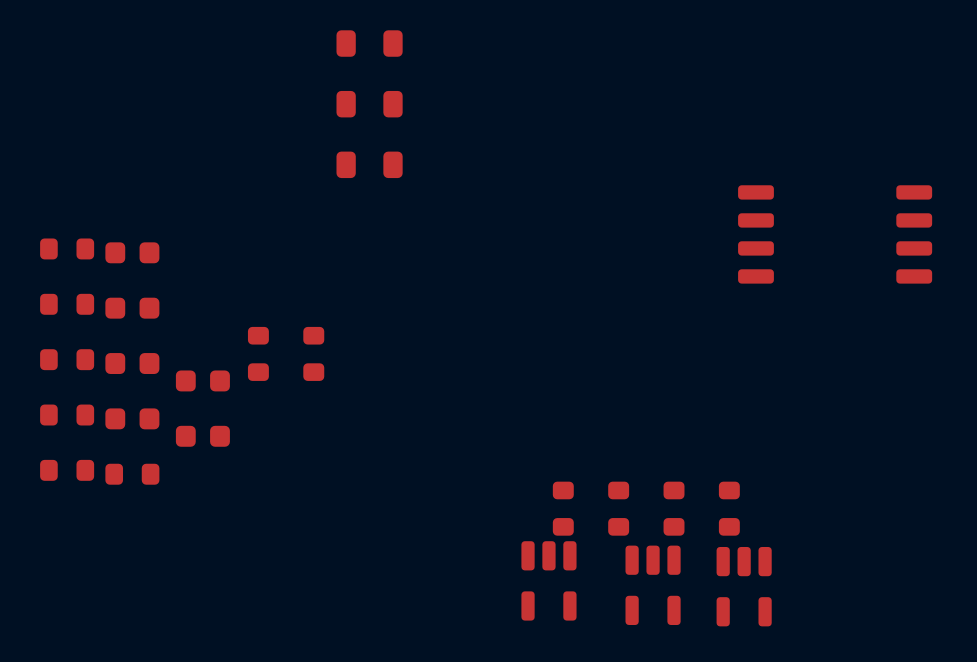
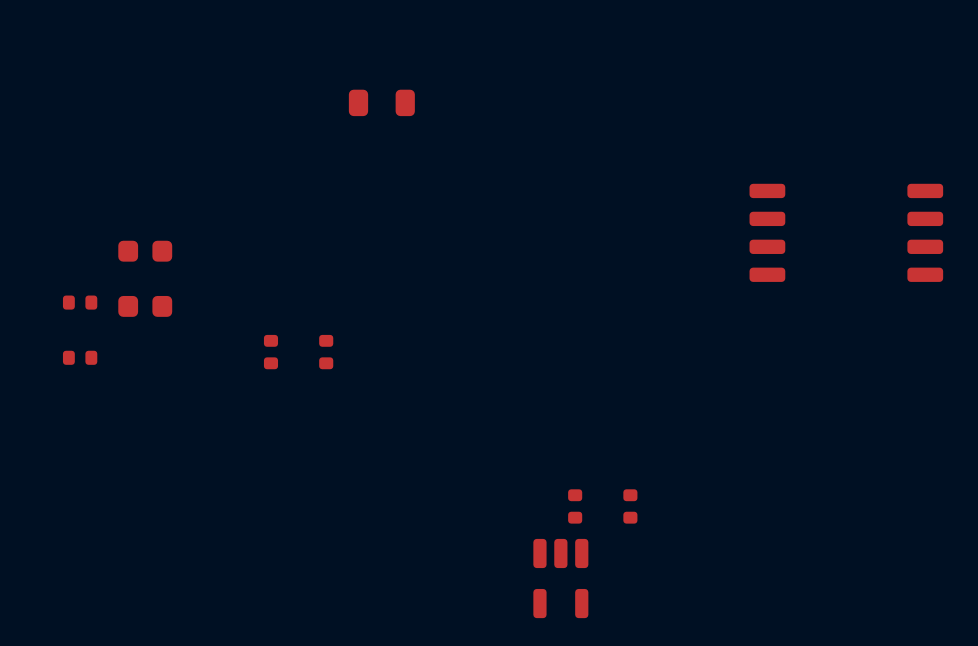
part: (369, 43) -> none
part: (369, 164) -> none
part: (67, 248) -> none
part footprint: [40, 293, 95, 315] -> [62, 295, 98, 310]
part footprint: [247, 326, 269, 381] -> [263, 334, 279, 370]
part footprint: [303, 326, 325, 381] -> [319, 334, 334, 370]
part footprint: [40, 349, 95, 371] -> [62, 350, 98, 365]
part: (132, 363) -> none
part: (202, 380) -> none
part: (67, 415) -> none
part: (132, 418) -> none
part: (202, 436) -> none
part: (67, 470) -> none
part: (132, 474) -> none
part footprint: [552, 481, 574, 536] -> [568, 489, 583, 524]
part footprint: [608, 481, 630, 536] -> [623, 489, 638, 524]
part: (674, 508) -> none
part: (729, 508) -> none
part: (653, 585) -> none
part: (744, 586) -> none

